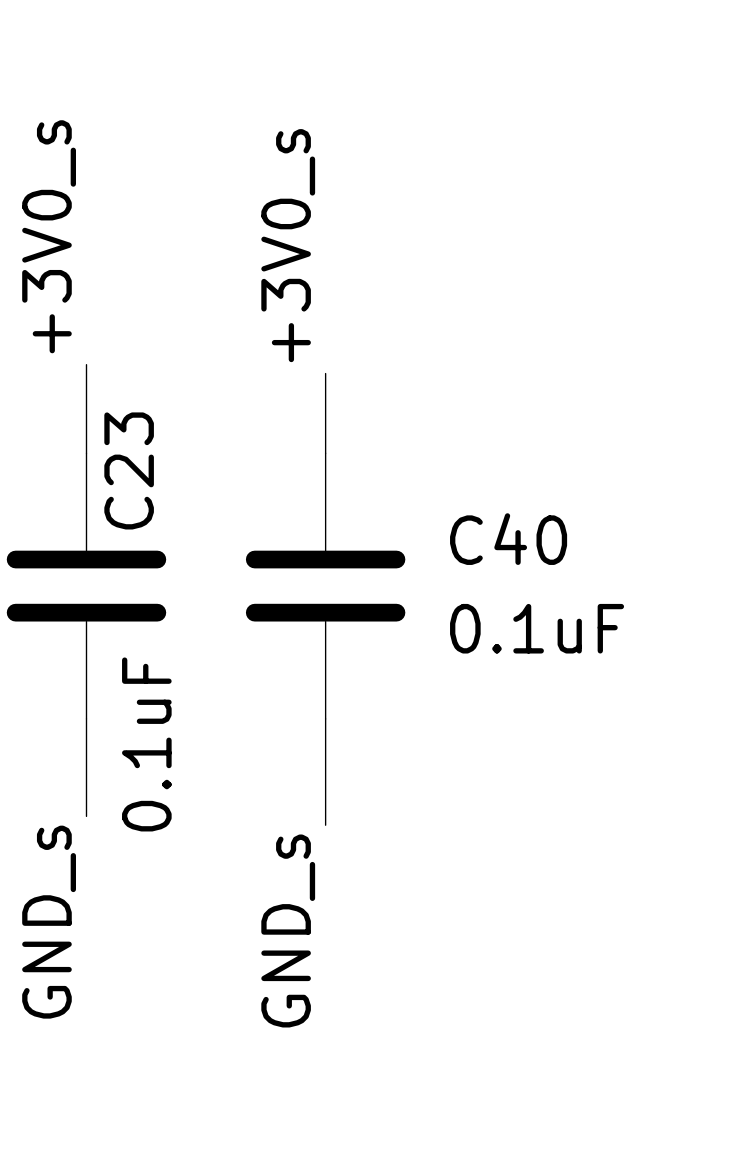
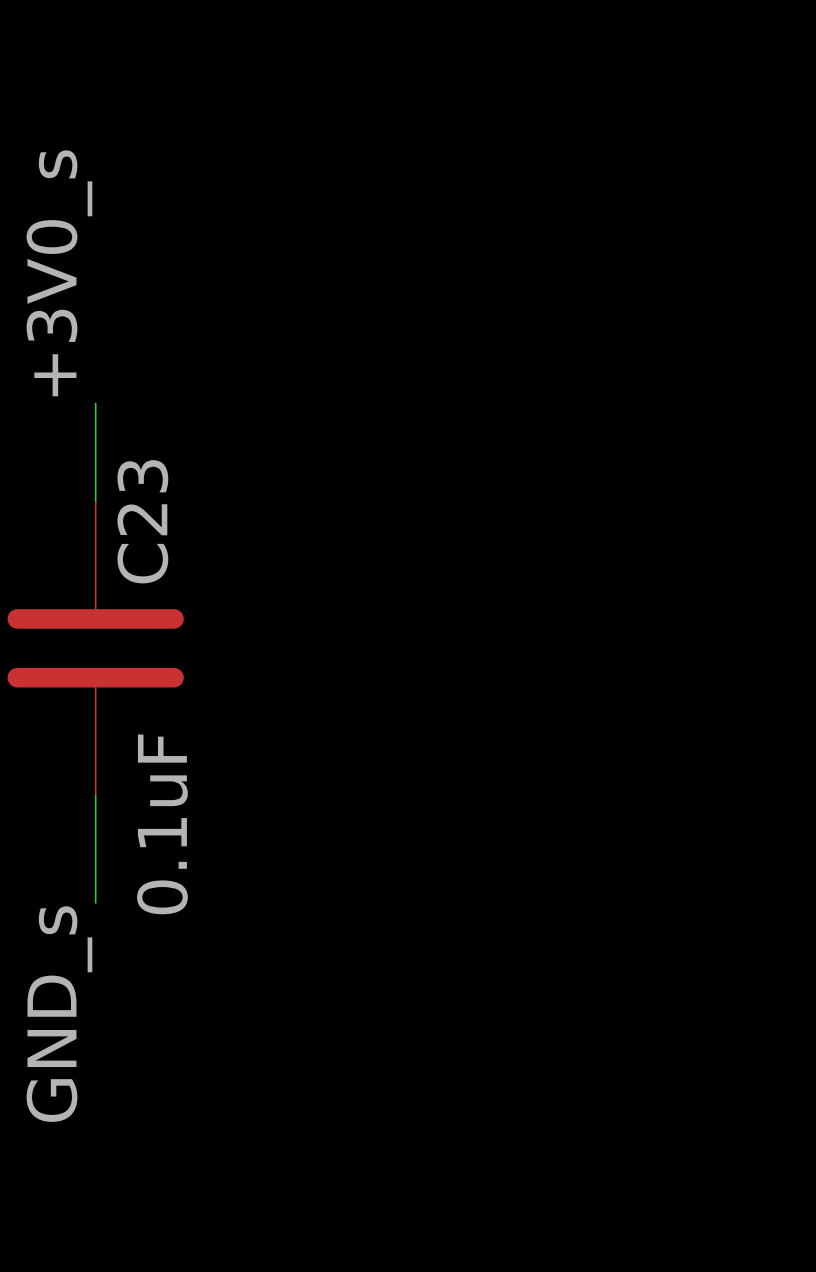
label: +3V0_s (288, 245) -> none
wire: (325, 373) (325, 453) -> none
C40: 0.1uF (325, 586) -> none
wire: (325, 718) (325, 825) -> none
label: GND_s (288, 930) -> none

